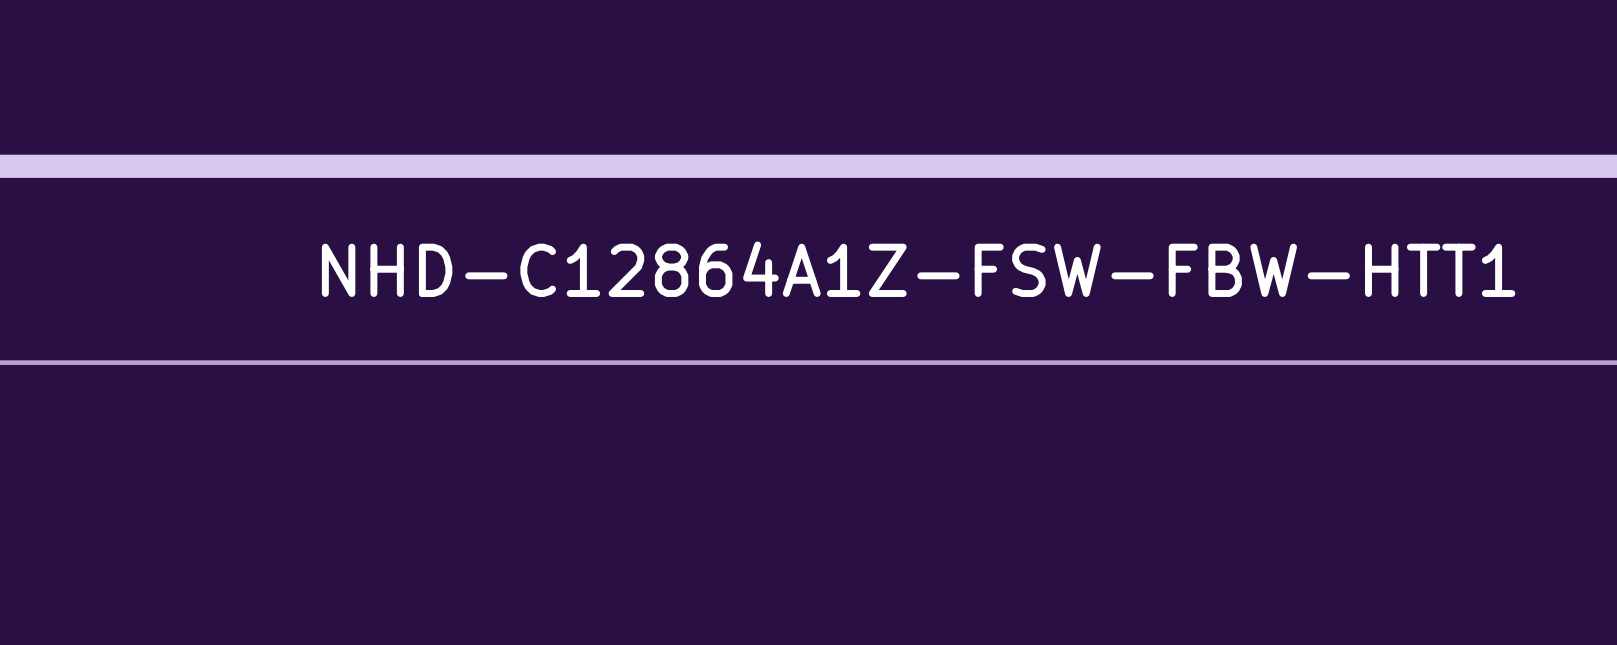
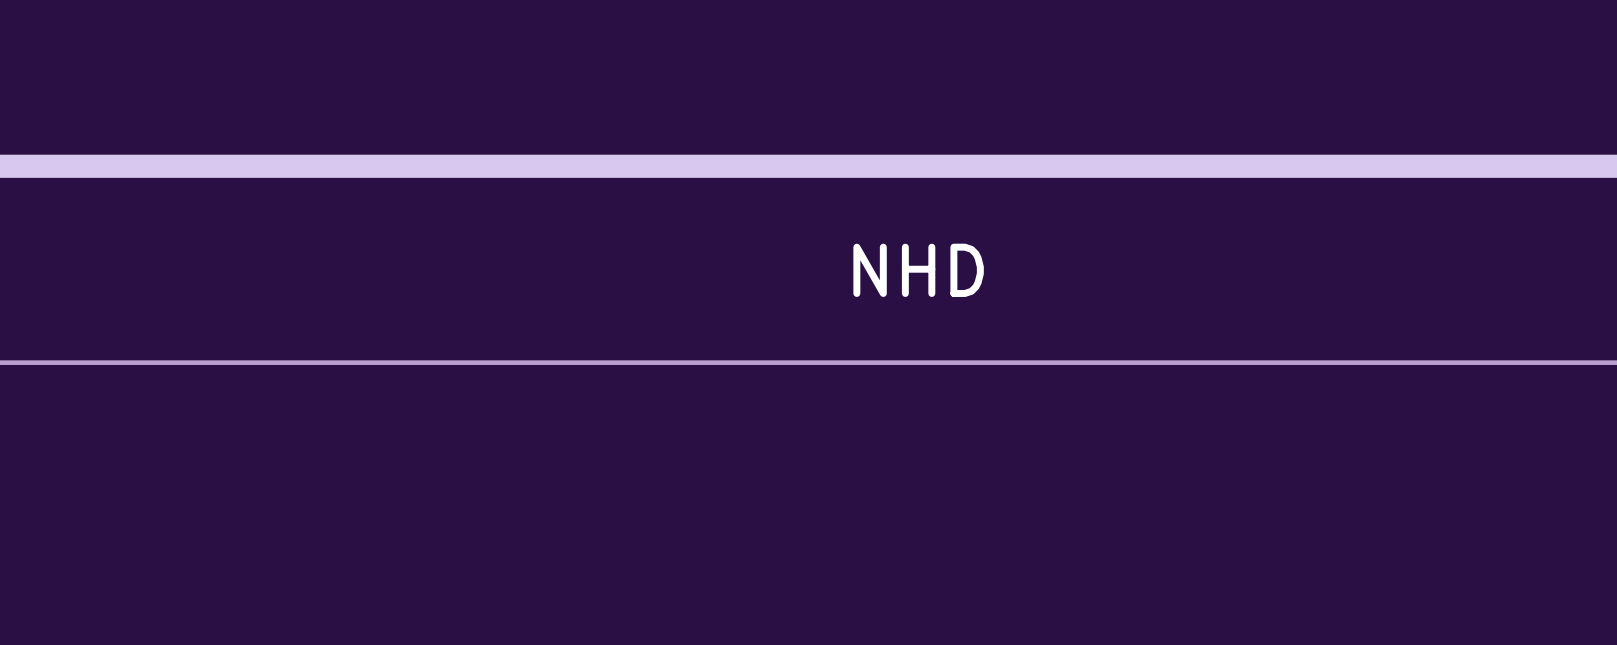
NHD-C12864A1Z-FSW-FBW-HTT1 name: NHD-C12864A1Z-FSW-FBW-HTT1 (918, 269) -> NHD (918, 270)

